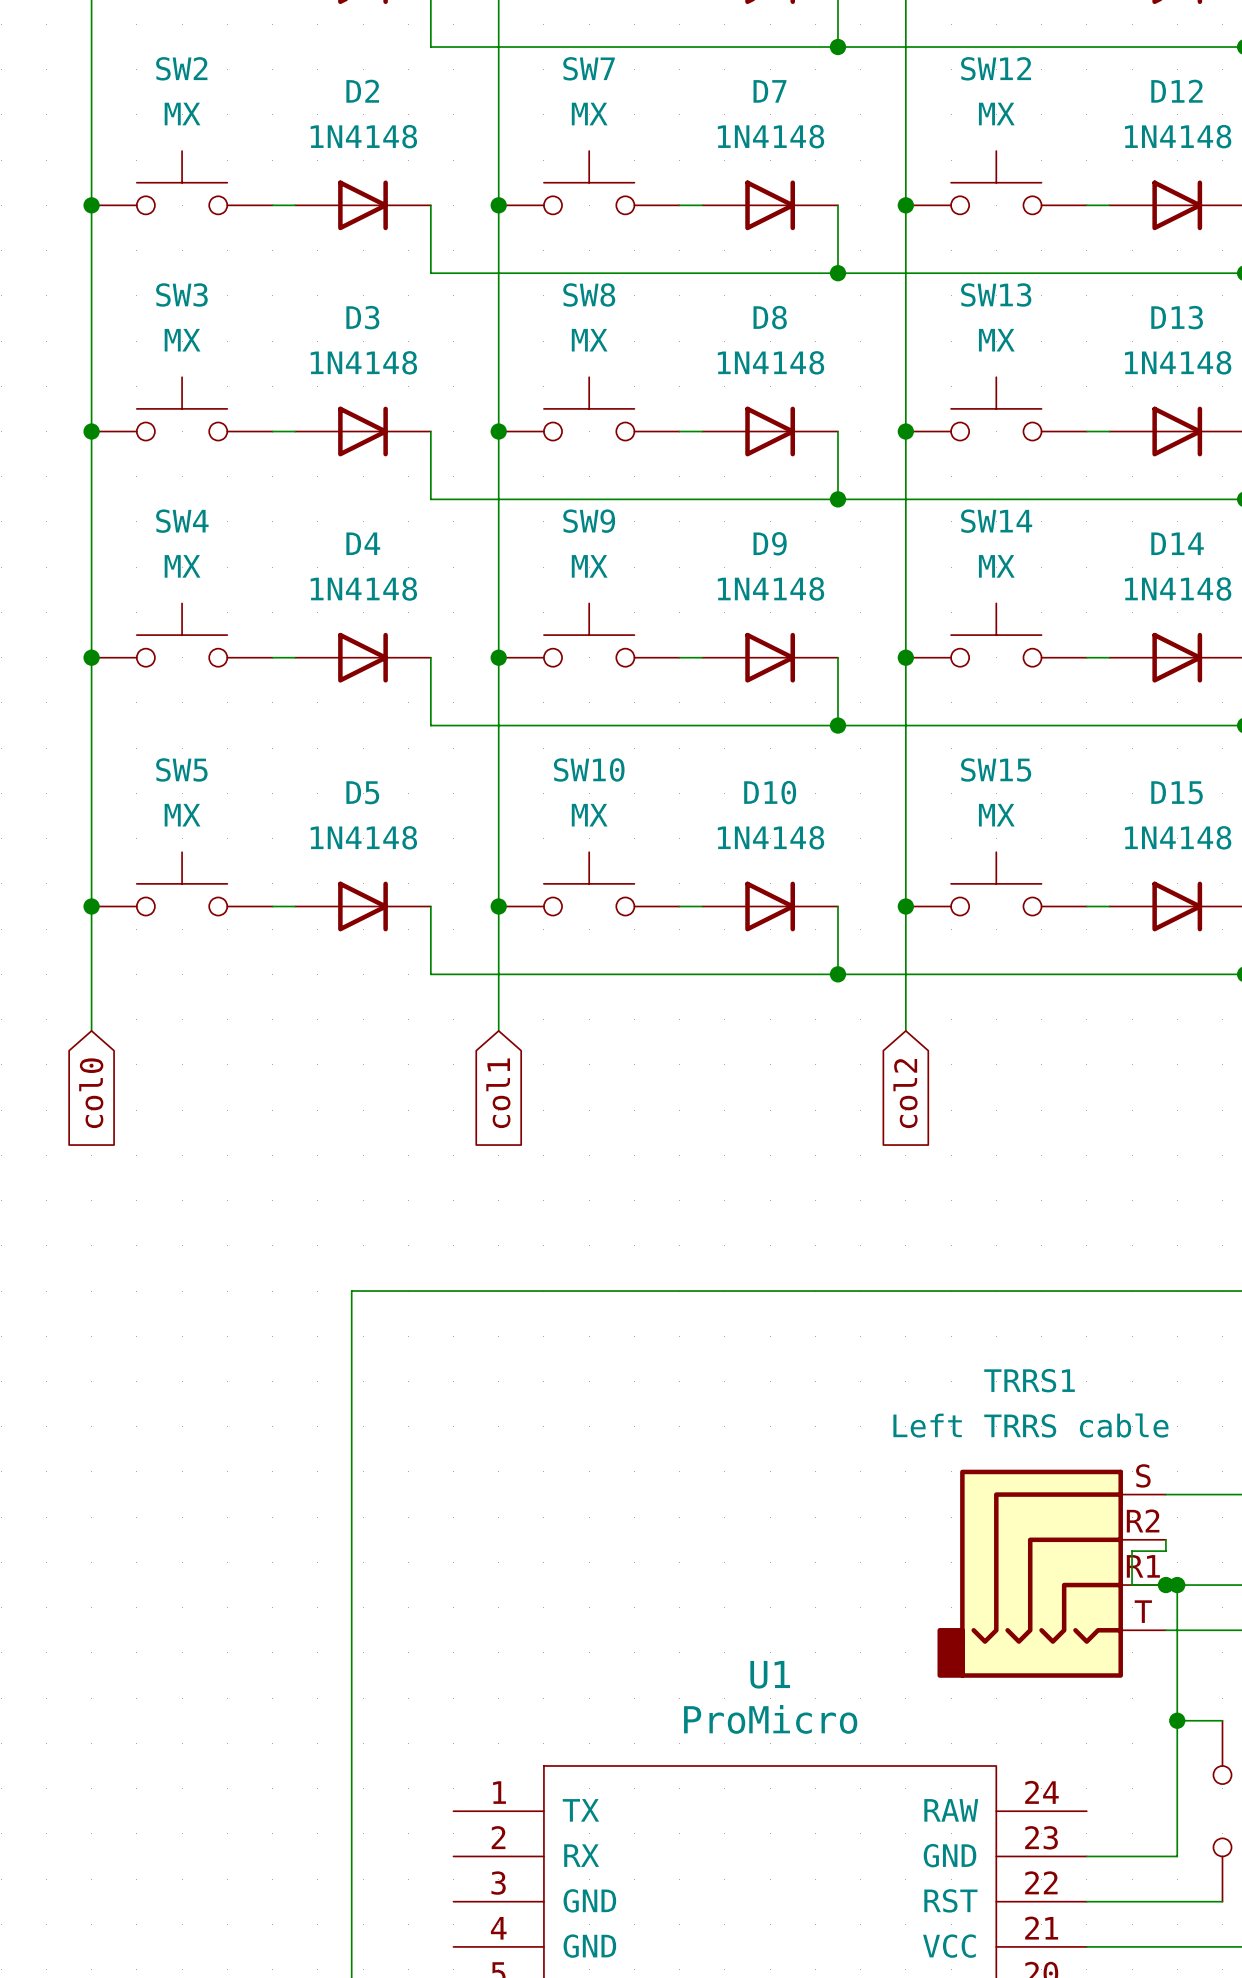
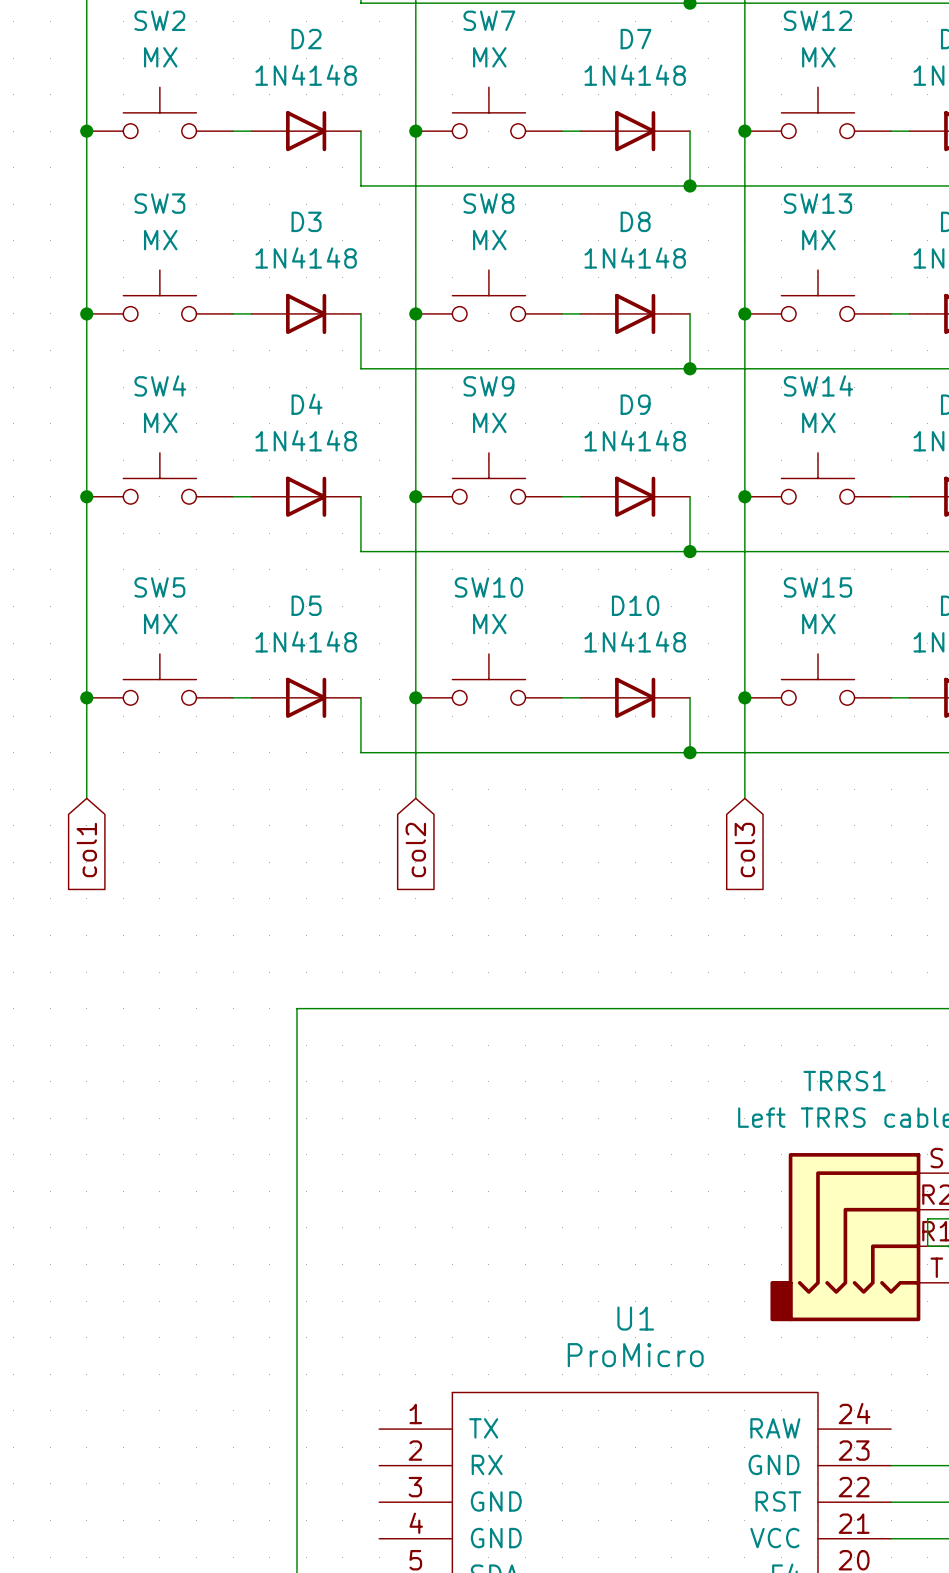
global label: col0 (91, 1093) -> col1 (86, 849)
global label: col1 (498, 1093) -> col2 (415, 849)
global label: col2 (905, 1093) -> col3 (744, 849)

